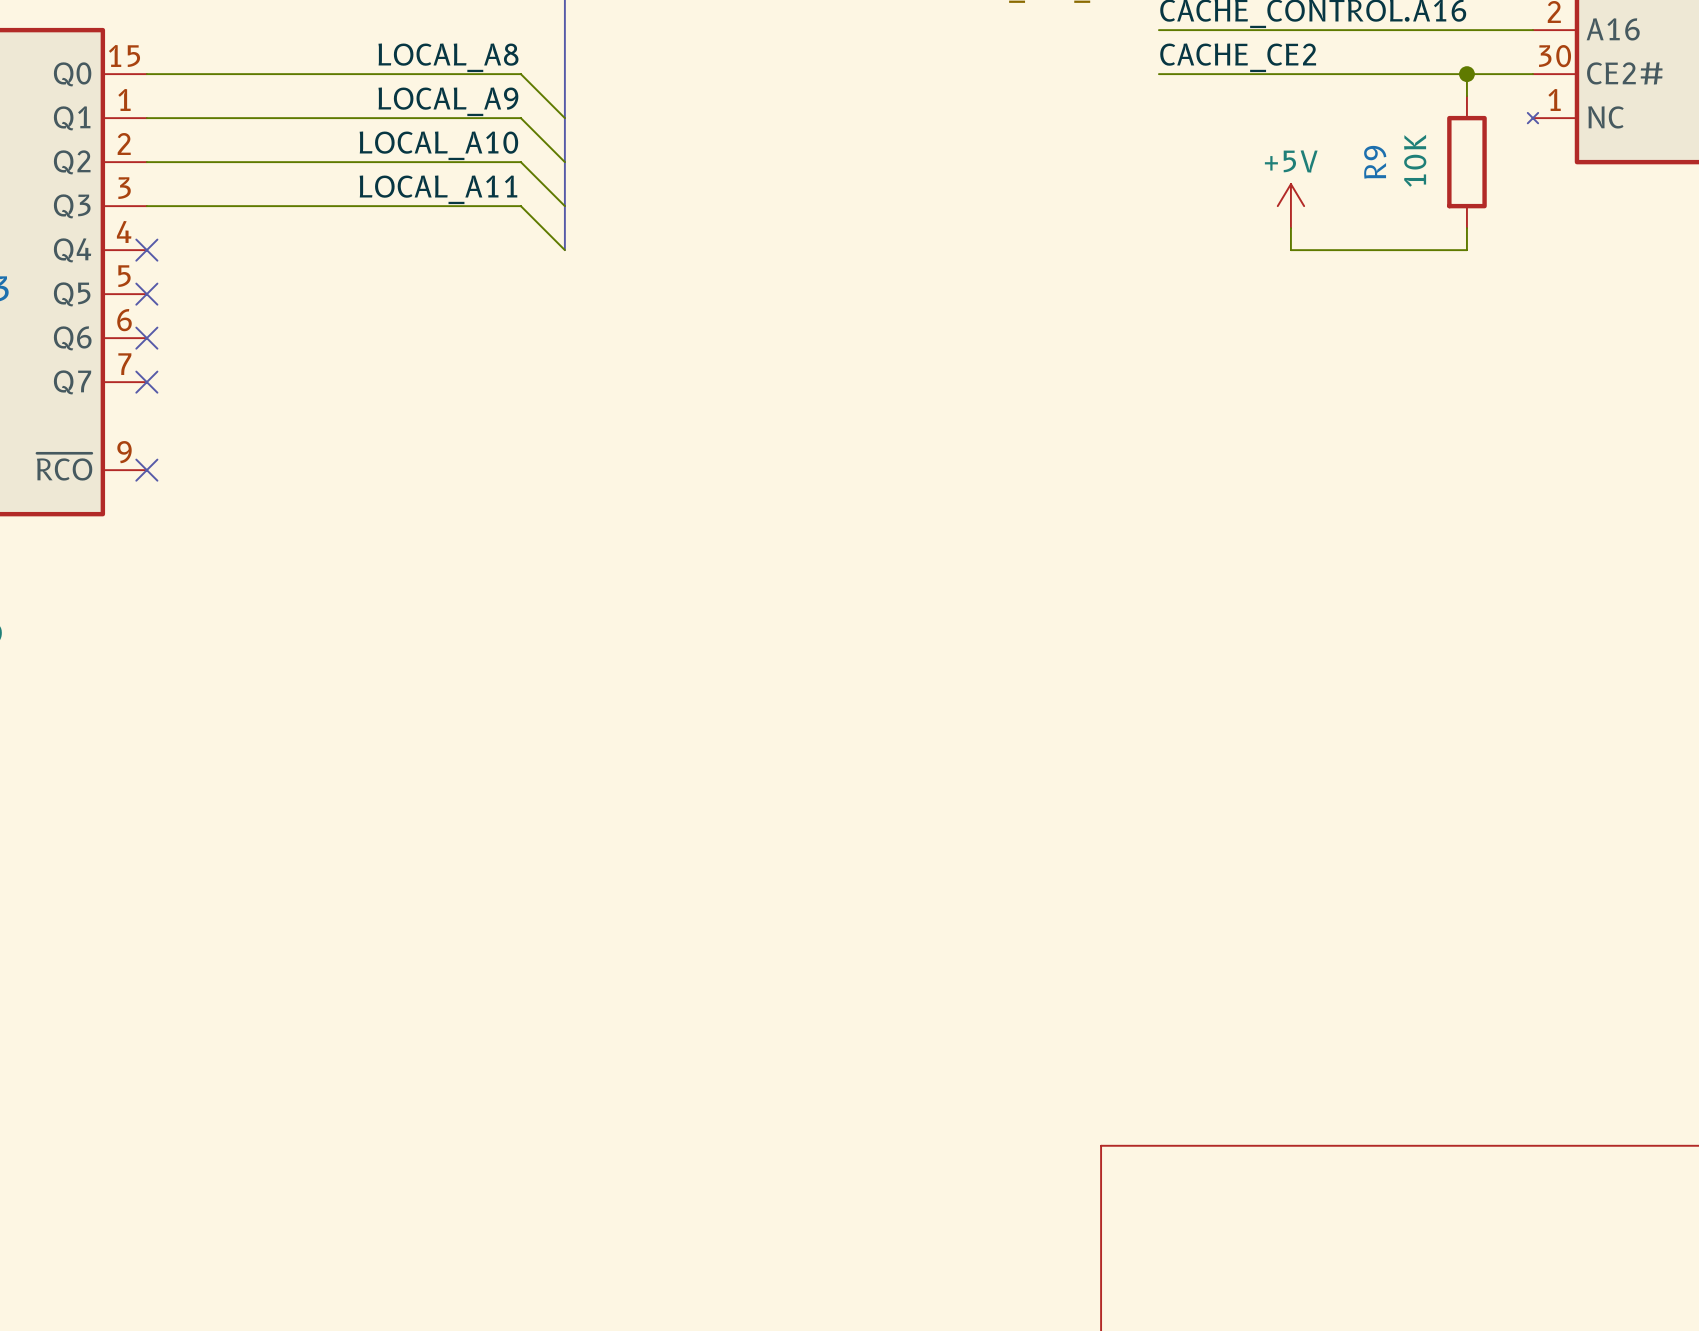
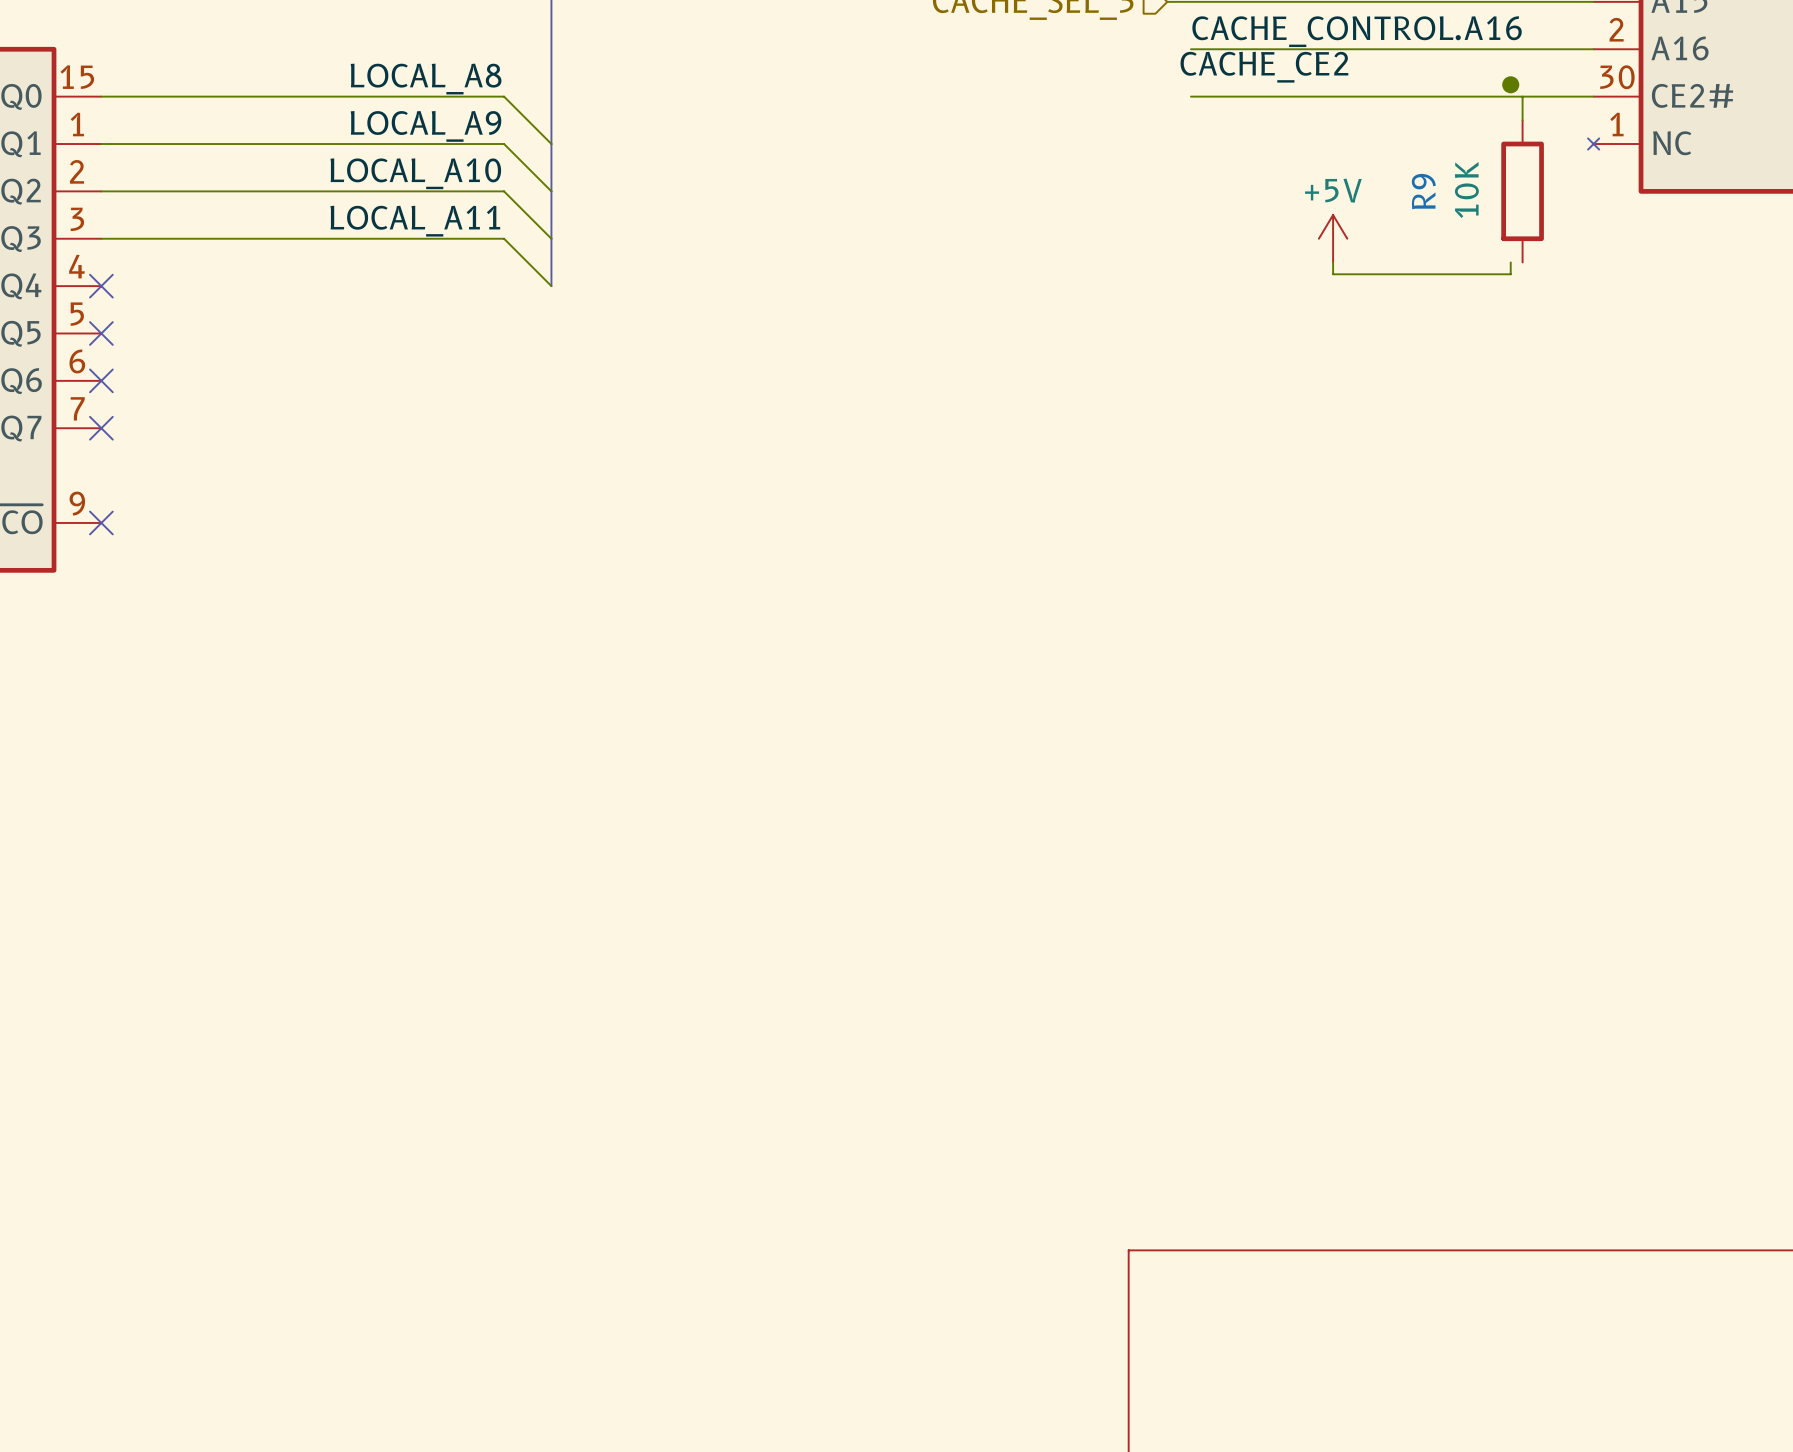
label position: CACHE_CE2 (1238, 57) -> CACHE_CE2 (1264, 67)
junction position: (1466, 74) -> (1510, 84)
wire: (1466, 228) (1466, 250) (1290, 250) (1290, 239) -> (1510, 262) (1510, 274) (1333, 274)

